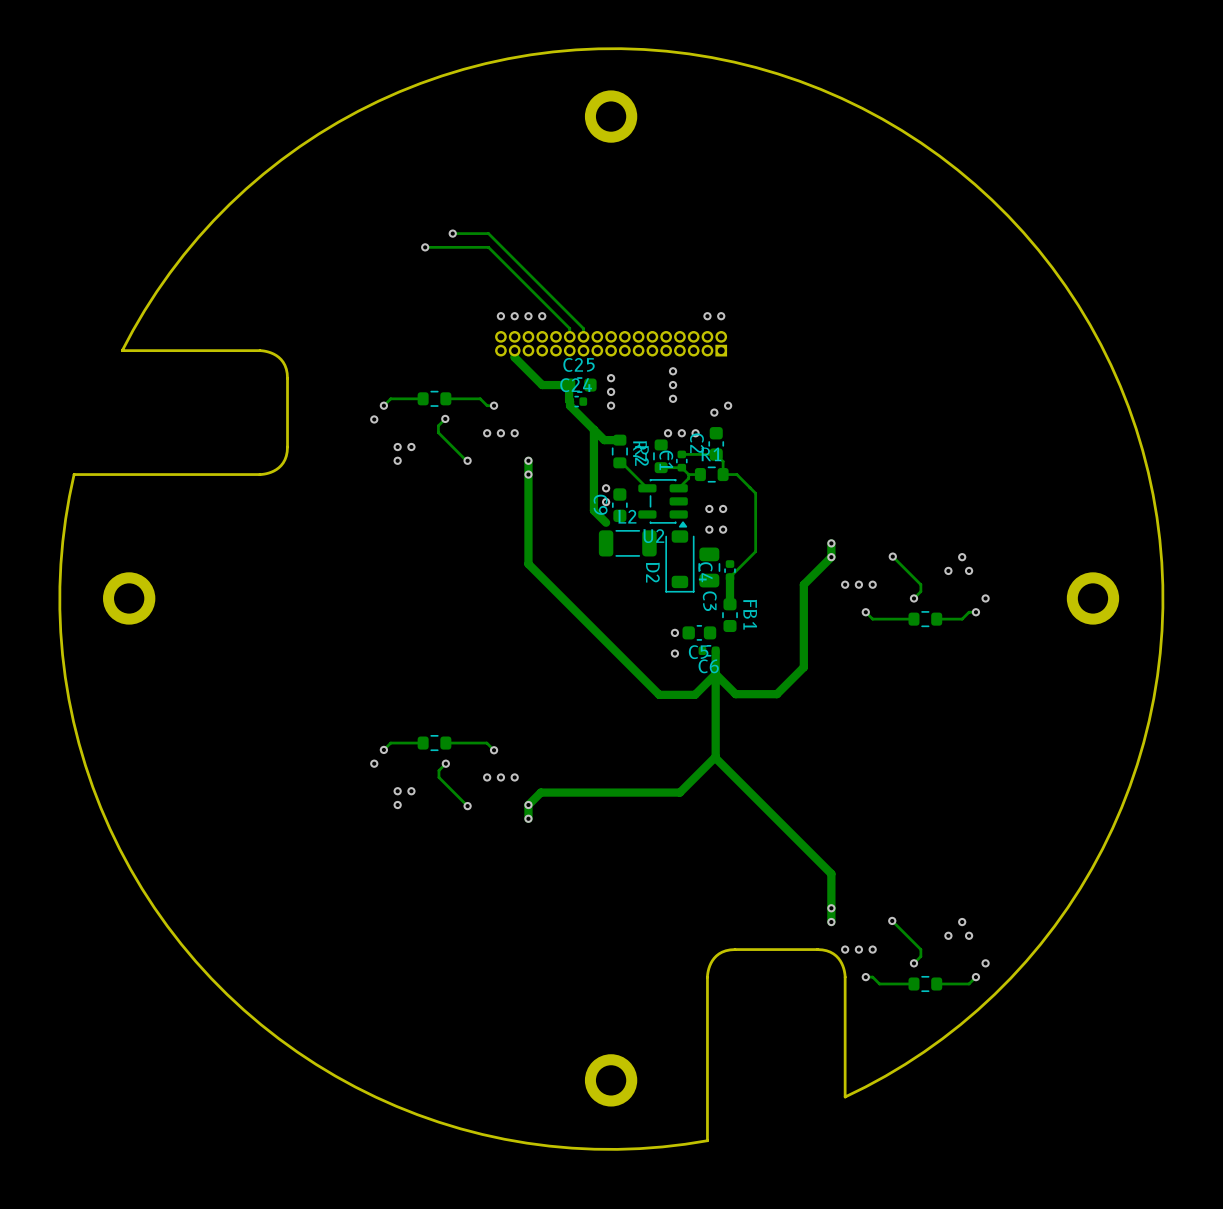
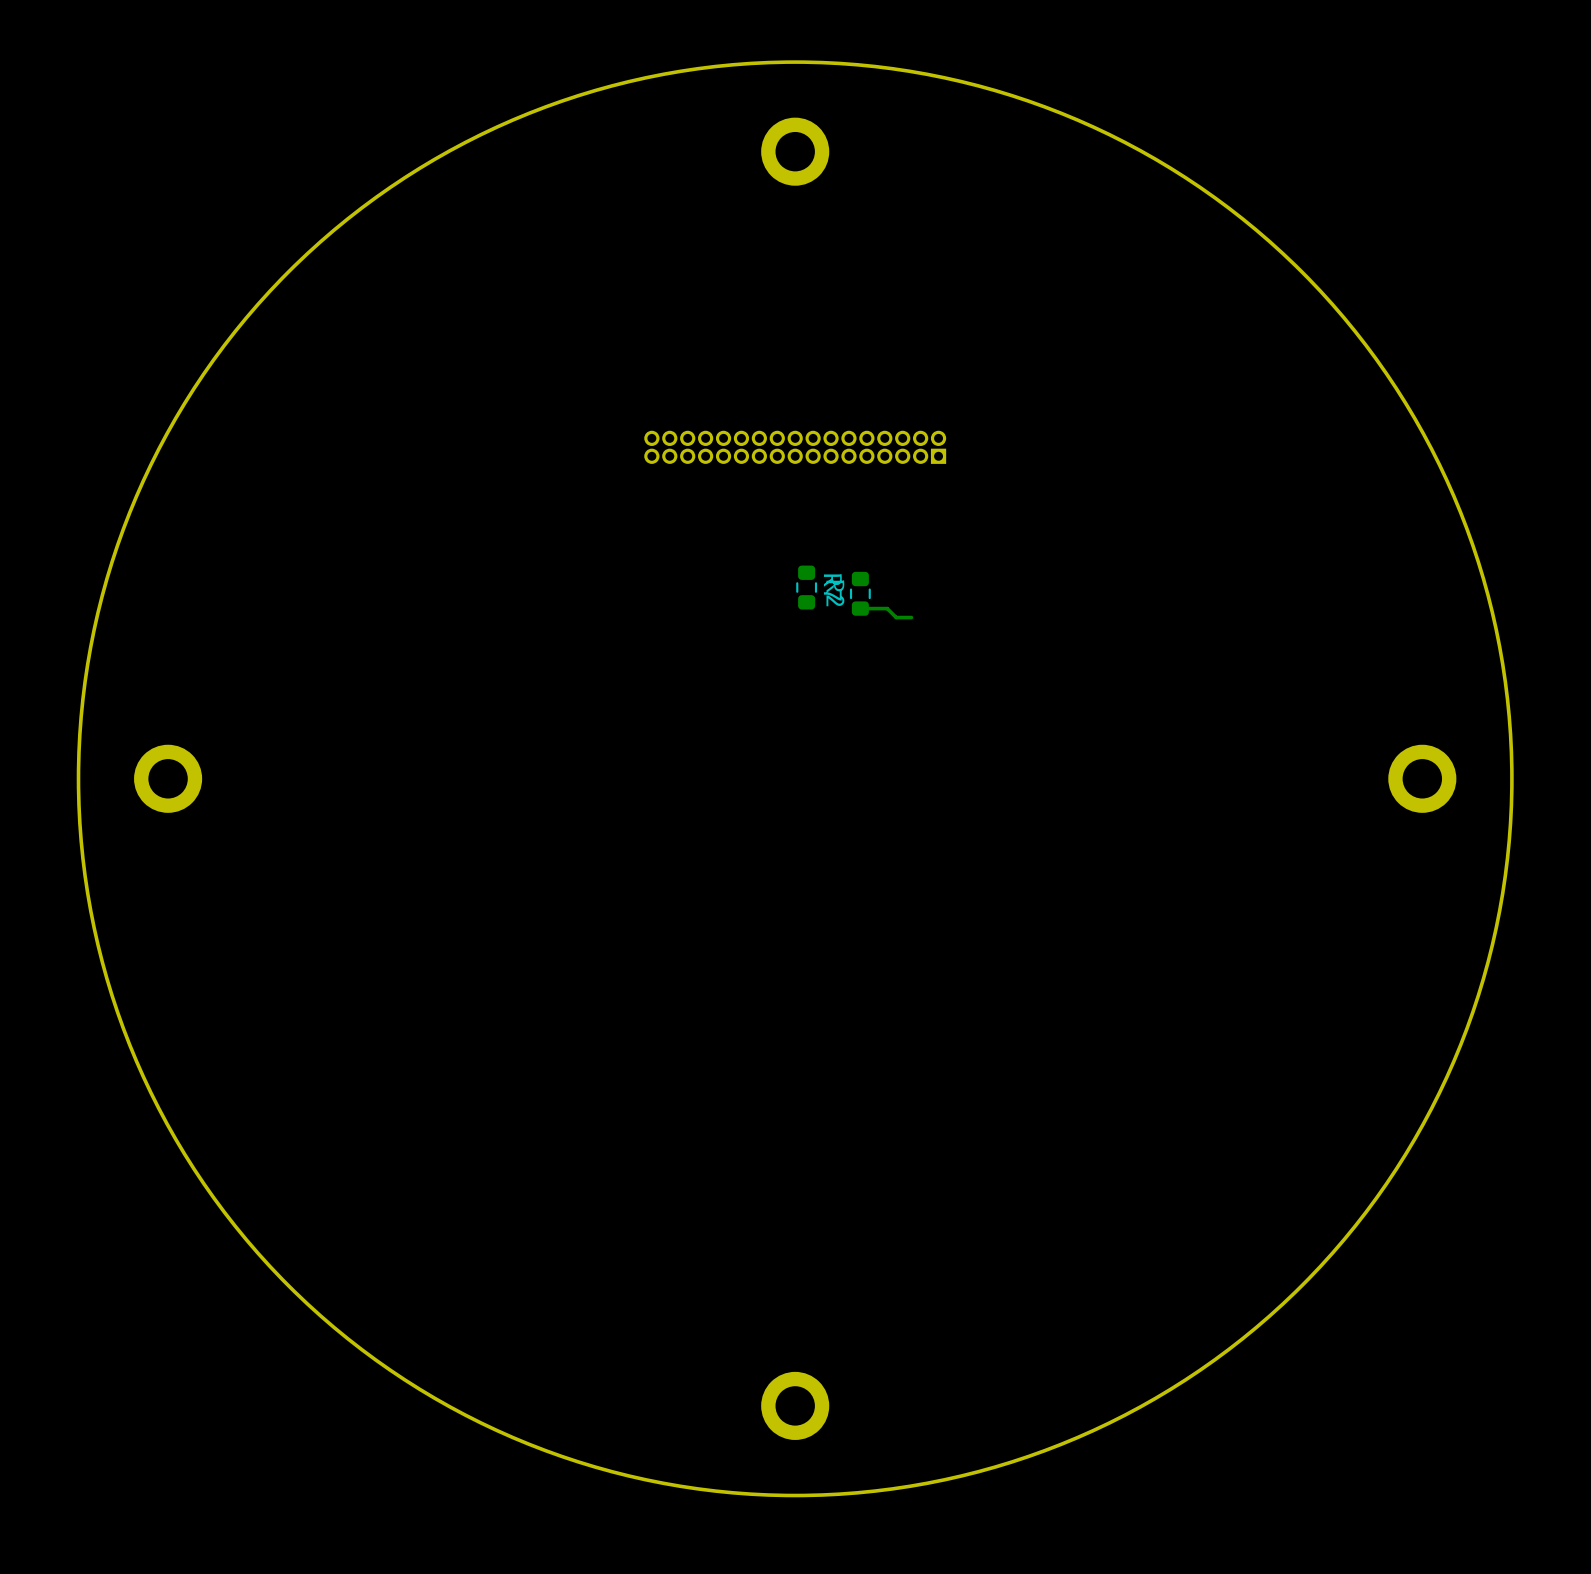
round board edge: none -> [76, 60, 1514, 1498]
track: (452, 233) (488, 233) (583, 328) (583, 336) -> none
via: (452, 233) -> none
track: (425, 247) (488, 247) (569, 328) (569, 336) -> none
via: (425, 247) -> none
via: (500, 316) -> none
via: (514, 316) -> none
via: (528, 316) -> none
via: (542, 316) -> none
via: (707, 316) -> none
via: (721, 316) -> none
board edge: (259, 350) (122, 350) (156, 291) (183, 255) (229, 204) (263, 174) (299, 146) (338, 122) (399, 91) (441, 75) (508, 58) (575, 49) (621, 48) (689, 53) (756, 67) (820, 89) (882, 119) (921, 142) (957, 169) (1008, 215) (1038, 249) (1078, 305) (1100, 344) (1120, 386) (1142, 450) (1153, 494) (1159, 539) (1162, 585) (1162, 630) (1153, 698) (1137, 764) (1121, 807) (1091, 868) (1067, 907) (1026, 961) (994, 994) (960, 1024) (905, 1064) (845, 1097) (845, 976) (842, 965) (838, 958) (830, 952) (817, 949) (734, 949) (719, 953) (710, 963) (707, 975) (707, 1140) (662, 1146) (617, 1149) (571, 1148) (504, 1139) (438, 1122) (396, 1106) (355, 1087) (297, 1051) (260, 1024) (211, 978) (167, 926) (130, 869) (100, 808) (79, 743) (65, 677) (60, 632) (59, 586) (62, 541) (74, 474) (261, 474) (273, 471) (283, 462) (287, 447) (286, 369) (283, 362) (276, 355) (259, 350) -> none
track: (514, 350) (514, 357) (542, 385) (569, 385) (570, 405) (604, 440) (619, 440) -> none
via: (673, 371) -> none
via: (611, 378) -> none
C25: (579, 385) -> none
via: (673, 385) -> none
via: (611, 391) -> none
track: (423, 398) (390, 398) (383, 405) -> none
part: (434, 398) -> none
track: (445, 398) (480, 398) (487, 405) (494, 405) -> none
via: (673, 398) -> none
C24: (576, 401) -> none
via: (383, 405) -> none
via: (494, 405) -> none
via: (611, 405) -> none
via: (728, 405) -> none
via: (714, 412) -> none
track: (445, 418) (438, 425) (438, 432) (467, 461) -> none
via: (445, 418) -> none
via: (374, 419) -> none
track: (593, 429) (593, 510) (606, 522) -> none
via: (487, 433) -> none
via: (500, 433) -> none
via: (514, 433) -> none
via: (668, 433) -> none
via: (681, 433) -> none
via: (695, 433) -> none
C2: (716, 443) -> none
via: (397, 447) -> none
via: (411, 447) -> none
track: (681, 454) (716, 454) (723, 461) (723, 474) (736, 474) (755, 493) (755, 551) (730, 577) (730, 604) -> none
via: (397, 460) -> none
via: (467, 460) -> none
track: (528, 460) (528, 564) (659, 694) (695, 694) (715, 674) (735, 694) (776, 694) (803, 667) (803, 584) (831, 557) (831, 543) -> none
via: (528, 460) -> none
C1: (681, 461) -> none
track: (619, 462) (647, 488) -> none
via: (528, 474) -> none
track: (688, 474) (688, 478) (678, 488) -> none
R1: (711, 474) -> none
via: (606, 488) -> none
via: (606, 502) -> none
U2: (663, 503) -> none
C9: (619, 505) -> none
via: (709, 508) -> none
via: (723, 508) -> none
via: (709, 529) -> none
via: (723, 529) -> none
L2: (627, 543) -> none
via: (831, 543) -> none
track: (892, 556) (920, 584) (920, 591) (913, 598) -> none
via: (892, 556) -> none
via: (831, 557) -> none
via: (962, 557) -> none
D2: (679, 561) -> none
C3: (709, 567) -> none
C4: (730, 570) -> none
via: (948, 570) -> none
via: (969, 570) -> none
via: (845, 584) -> none
via: (858, 584) -> none
via: (872, 584) -> none
via: (913, 598) -> none
via: (985, 598) -> none
track: (865, 612) (872, 619) (913, 619) -> none
via: (865, 612) -> none
track: (975, 612) (969, 612) (962, 619) (936, 619) -> none
via: (975, 612) -> none
FB1: (730, 615) -> none
part: (925, 619) -> none
via: (674, 632) -> none
C5: (699, 632) -> none
C6: (709, 650) -> none
track: (715, 650) (715, 758) (831, 873) (831, 922) -> none
via: (674, 653) -> none
track: (423, 743) (390, 743) (383, 749) -> none
part: (434, 743) -> none
track: (445, 743) (486, 743) (494, 750) -> none
via: (383, 749) -> none
via: (494, 750) -> none
track: (715, 756) (679, 792) (540, 792) (528, 805) (528, 818) -> none
via: (374, 763) -> none
track: (445, 763) (438, 770) (438, 777) (467, 806) -> none
via: (445, 763) -> none
via: (487, 777) -> none
via: (500, 777) -> none
via: (514, 777) -> none
via: (397, 791) -> none
via: (411, 791) -> none
via: (397, 805) -> none
via: (528, 805) -> none
via: (467, 806) -> none
via: (528, 818) -> none
via: (831, 908) -> none
track: (892, 920) (920, 949) (920, 956) (913, 963) -> none
via: (892, 920) -> none
via: (831, 922) -> none
via: (962, 922) -> none
via: (948, 935) -> none
via: (969, 935) -> none
via: (845, 949) -> none
via: (858, 949) -> none
via: (872, 949) -> none
via: (913, 963) -> none
via: (985, 963) -> none
track: (865, 977) (872, 977) (879, 983) (913, 983) -> none
via: (865, 977) -> none
track: (975, 977) (969, 983) (936, 983) -> none
via: (975, 977) -> none
part: (925, 983) -> none

